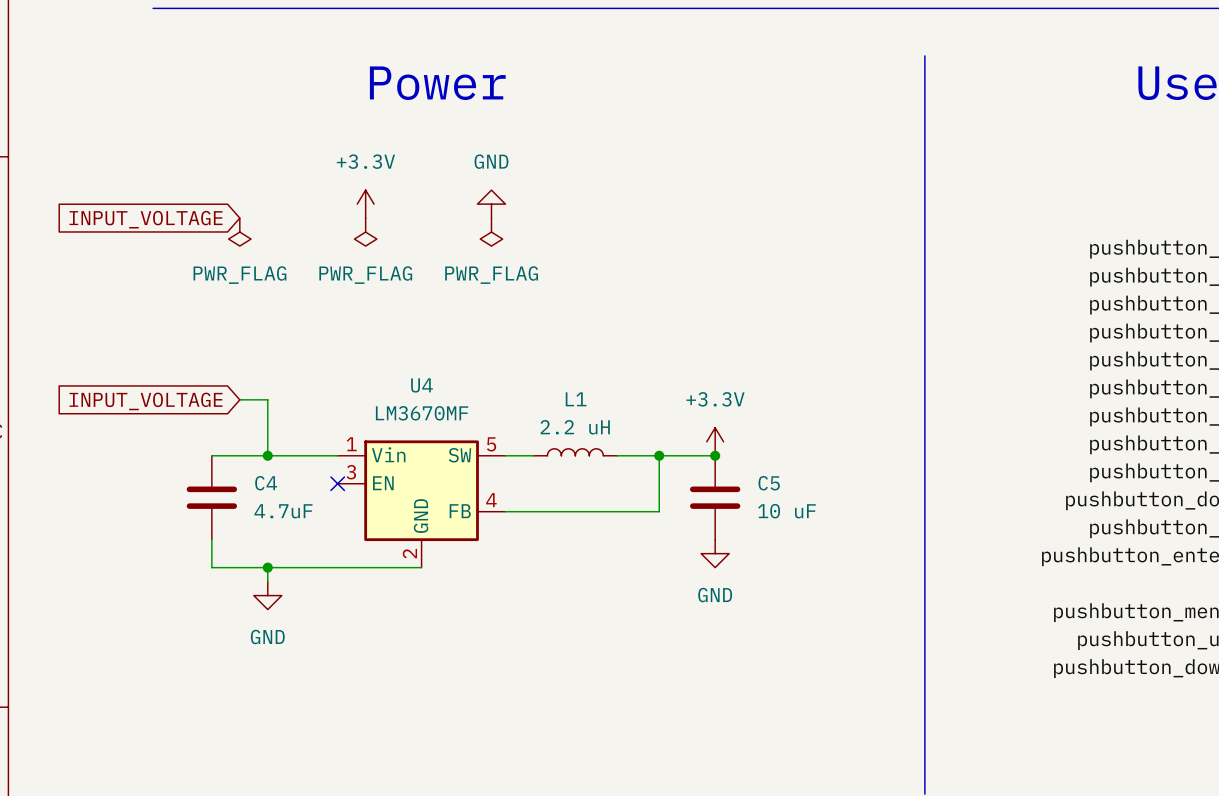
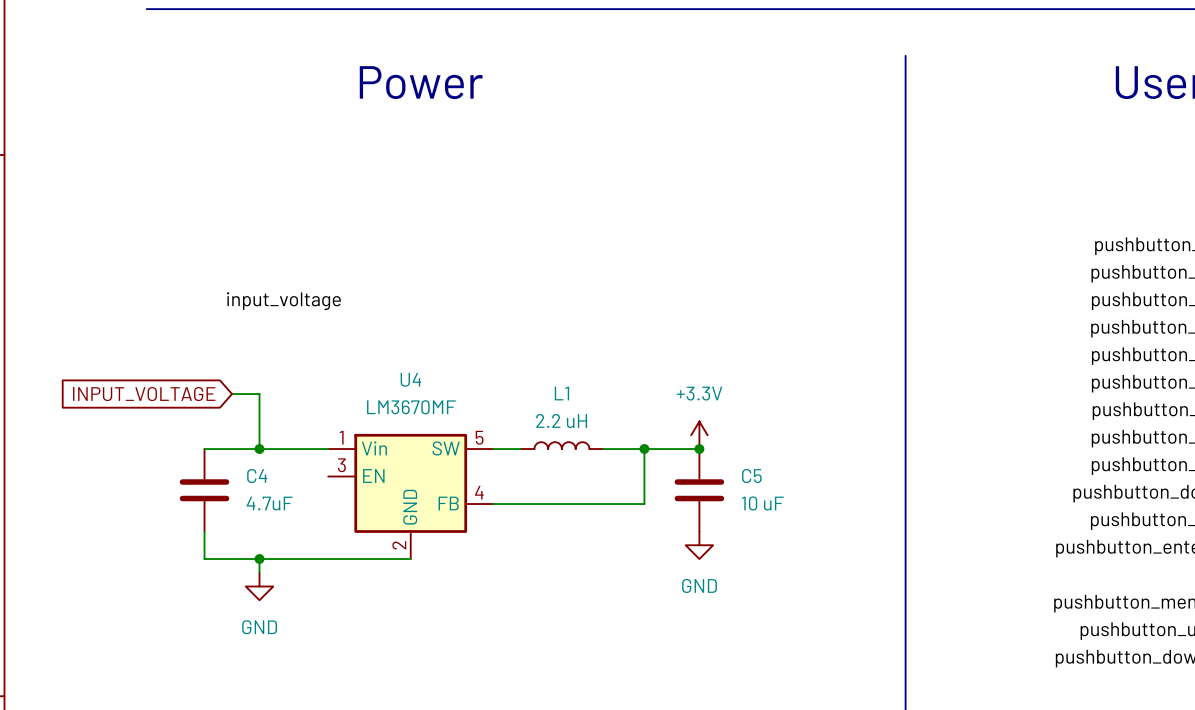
power symbol: +3.3V (365, 204) -> none
power symbol: GND (491, 204) -> none
global label: INPUT_VOLTAGE (146, 219) -> none
power symbol: PWR_FLAG (239, 232) -> none
power symbol: PWR_FLAG (365, 232) -> none
power symbol: PWR_FLAG (491, 232) -> none
label: none -> input_voltage (283, 301)
no-connect mark: (337, 483) -> none

